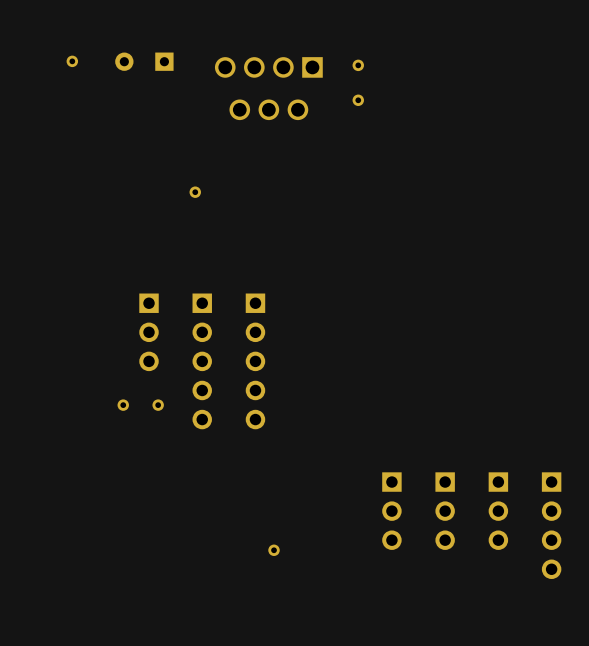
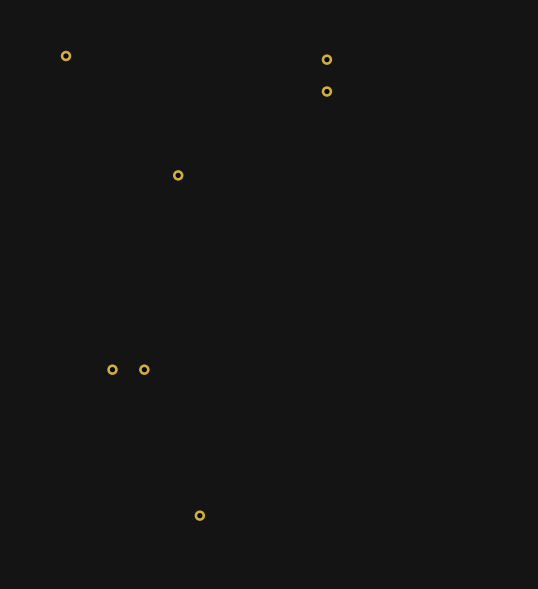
part: (144, 61) -> none
part: (268, 88) -> none
part: (149, 332) -> none
part: (202, 361) -> none
part: (255, 361) -> none
part: (391, 511) -> none
part: (445, 511) -> none
part: (498, 511) -> none
part: (551, 525) -> none
part position: (274, 550) -> (199, 515)

